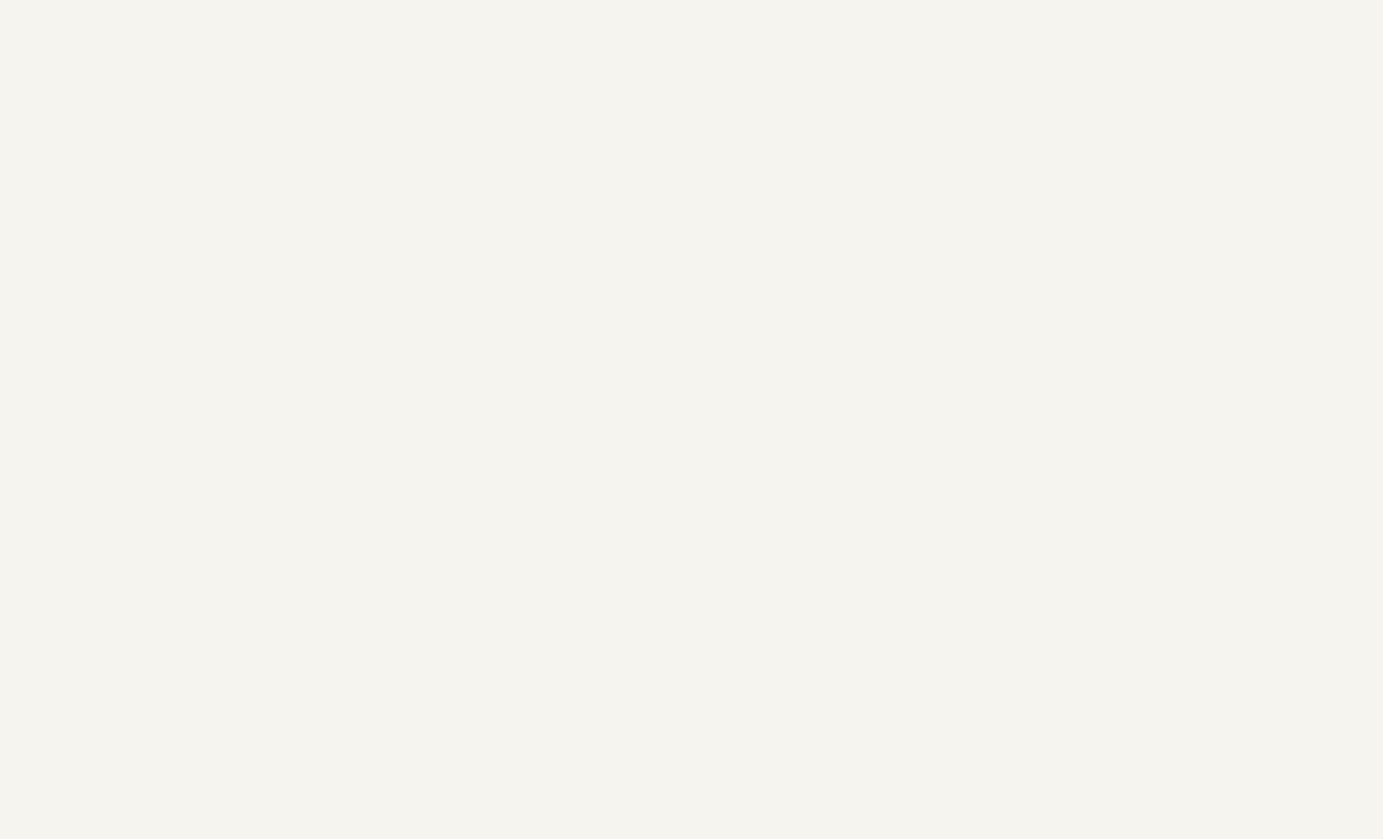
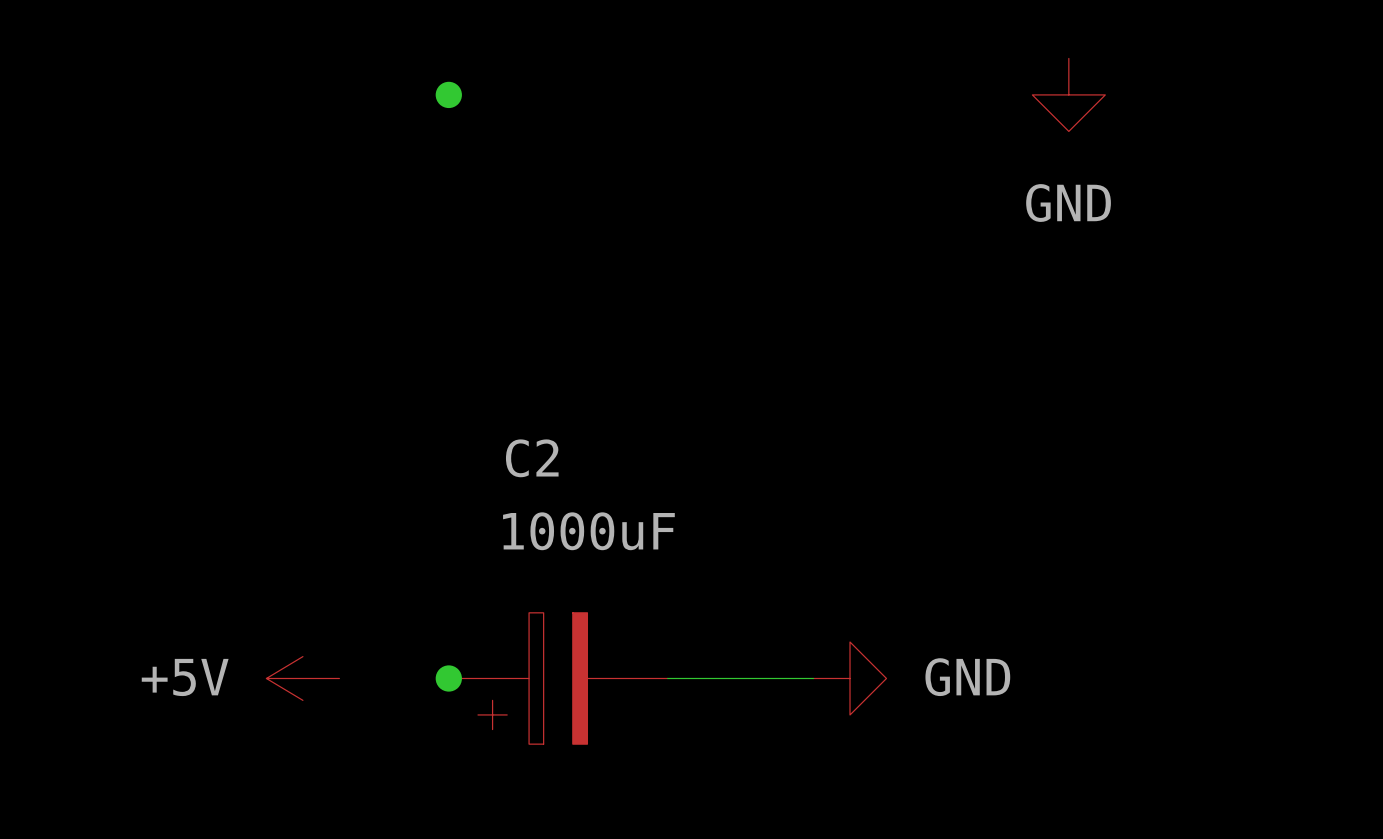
junction: none -> (448, 94)
power symbol: none -> GND (1068, 94)
power symbol: none -> +5V (302, 678)
junction: none -> (448, 678)
C2: none -> 1000uF (558, 678)
wire: none -> (667, 678) (813, 678)
power symbol: none -> GND (850, 678)

